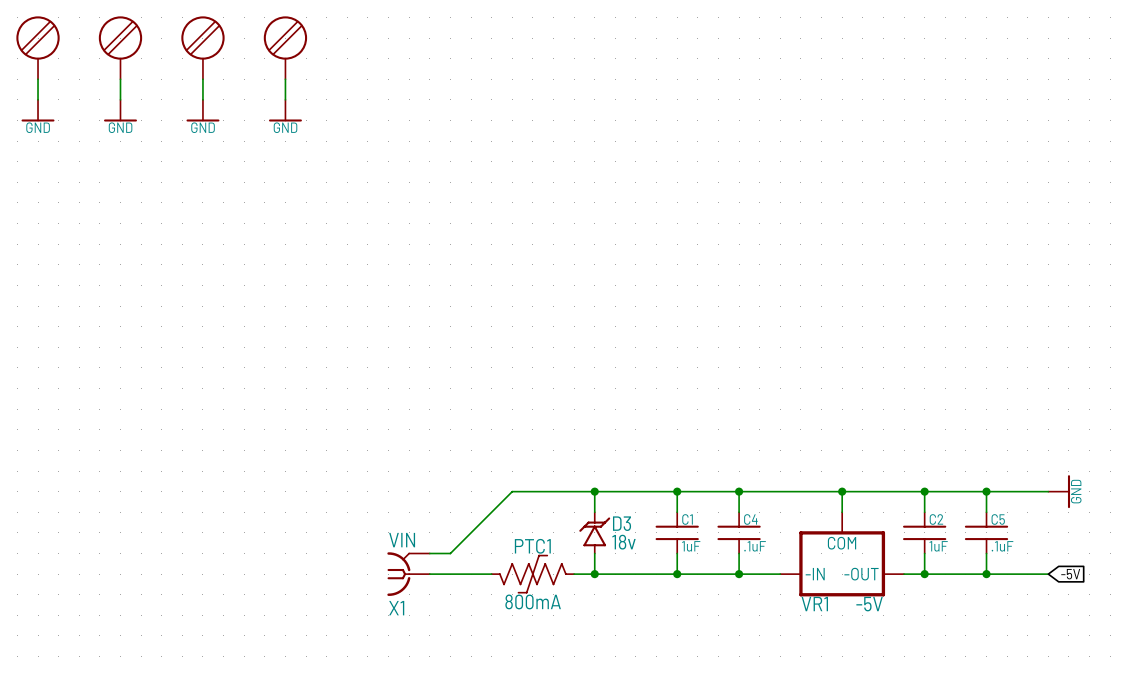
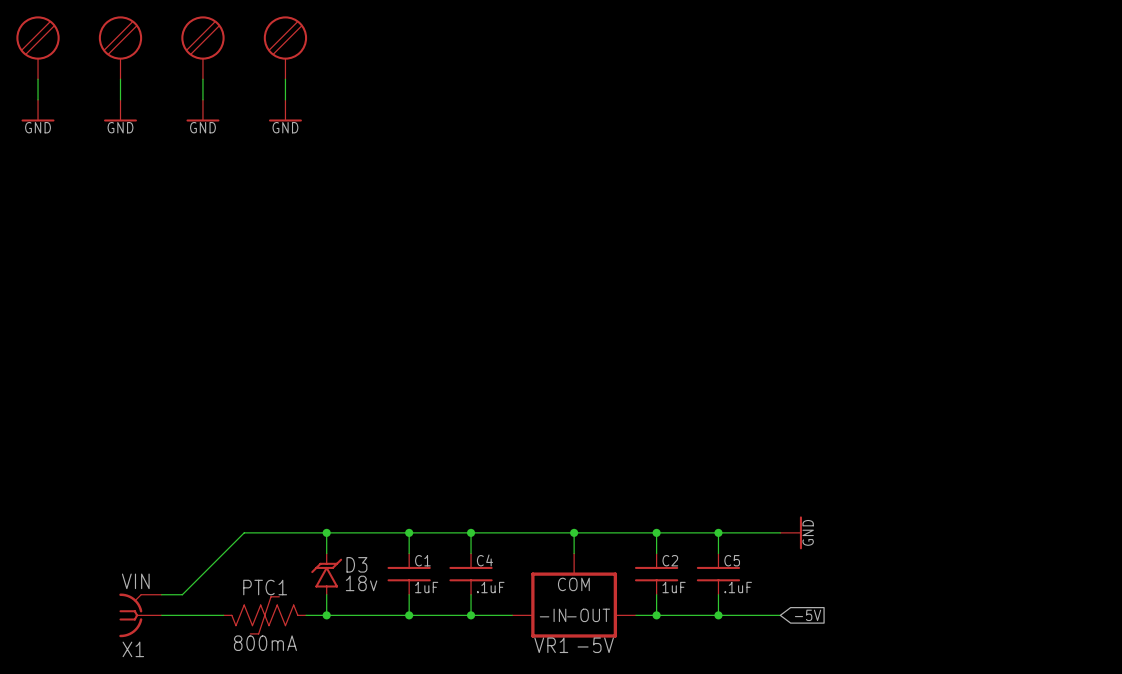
wire: (594, 491) (594, 512) -> (574, 532) (574, 553)
junction: (594, 491) -> none
wire: (677, 491) (677, 512) -> (656, 532) (656, 553)
junction: (677, 491) -> none
wire: (739, 491) (739, 512) -> (718, 532) (718, 553)
junction: (739, 491) -> none
wire: (842, 491) (842, 512) -> none
junction: (842, 491) -> none
wire: (924, 491) (924, 512) -> none
junction: (924, 491) -> none
wire: (986, 491) (986, 512) -> none
junction: (986, 491) -> none
wire: (1048, 491) (512, 491) (450, 553) (429, 553) -> none
power symbol: GND (1059, 491) -> none
wire: none -> (326, 532) (326, 553)
junction: none -> (326, 532)
junction: none -> (409, 532)
wire: none -> (471, 532) (471, 553)
junction: none -> (471, 532)
junction: none -> (574, 532)
D3 position: (594, 532) -> (326, 574)
junction: none -> (656, 532)
C1 position: (677, 532) -> (409, 574)
junction: none -> (718, 532)
C4 position: (739, 532) -> (471, 574)
wire: none -> (780, 532) (244, 532) (182, 594) (161, 594)
power symbol: none -> GND (791, 532)
C2 position: (924, 532) -> (656, 574)
C5 position: (986, 532) -> (718, 574)
wire: (594, 553) (594, 574) -> (471, 594) (471, 615)
wire: (677, 553) (677, 574) -> (656, 594) (656, 615)
wire: (739, 553) (739, 574) -> (718, 594) (718, 615)
wire: (924, 553) (924, 574) -> none
wire: (986, 553) (986, 574) -> none
VR1 position: (842, 554) -> (574, 595)
X1 position: (408, 574) -> (140, 615)
wire: (429, 574) (491, 574) -> none
PTC1 position: (532, 574) -> (264, 615)
wire: (574, 574) (780, 574) -> none
junction: (594, 574) -> none
junction: (677, 574) -> none
junction: (739, 574) -> none
wire: (904, 574) (1048, 574) -> none
junction: (924, 574) -> none
junction: (986, 574) -> none
global label: -5V (1070, 574) -> none
wire: none -> (326, 594) (326, 615)
wire: none -> (409, 594) (409, 615)
wire: none -> (161, 615) (223, 615)
wire: none -> (306, 615) (512, 615)
junction: none -> (326, 615)
junction: none -> (409, 615)
junction: none -> (471, 615)
wire: none -> (635, 615) (780, 615)
junction: none -> (656, 615)
junction: none -> (718, 615)
global label: none -> -5V (808, 615)

